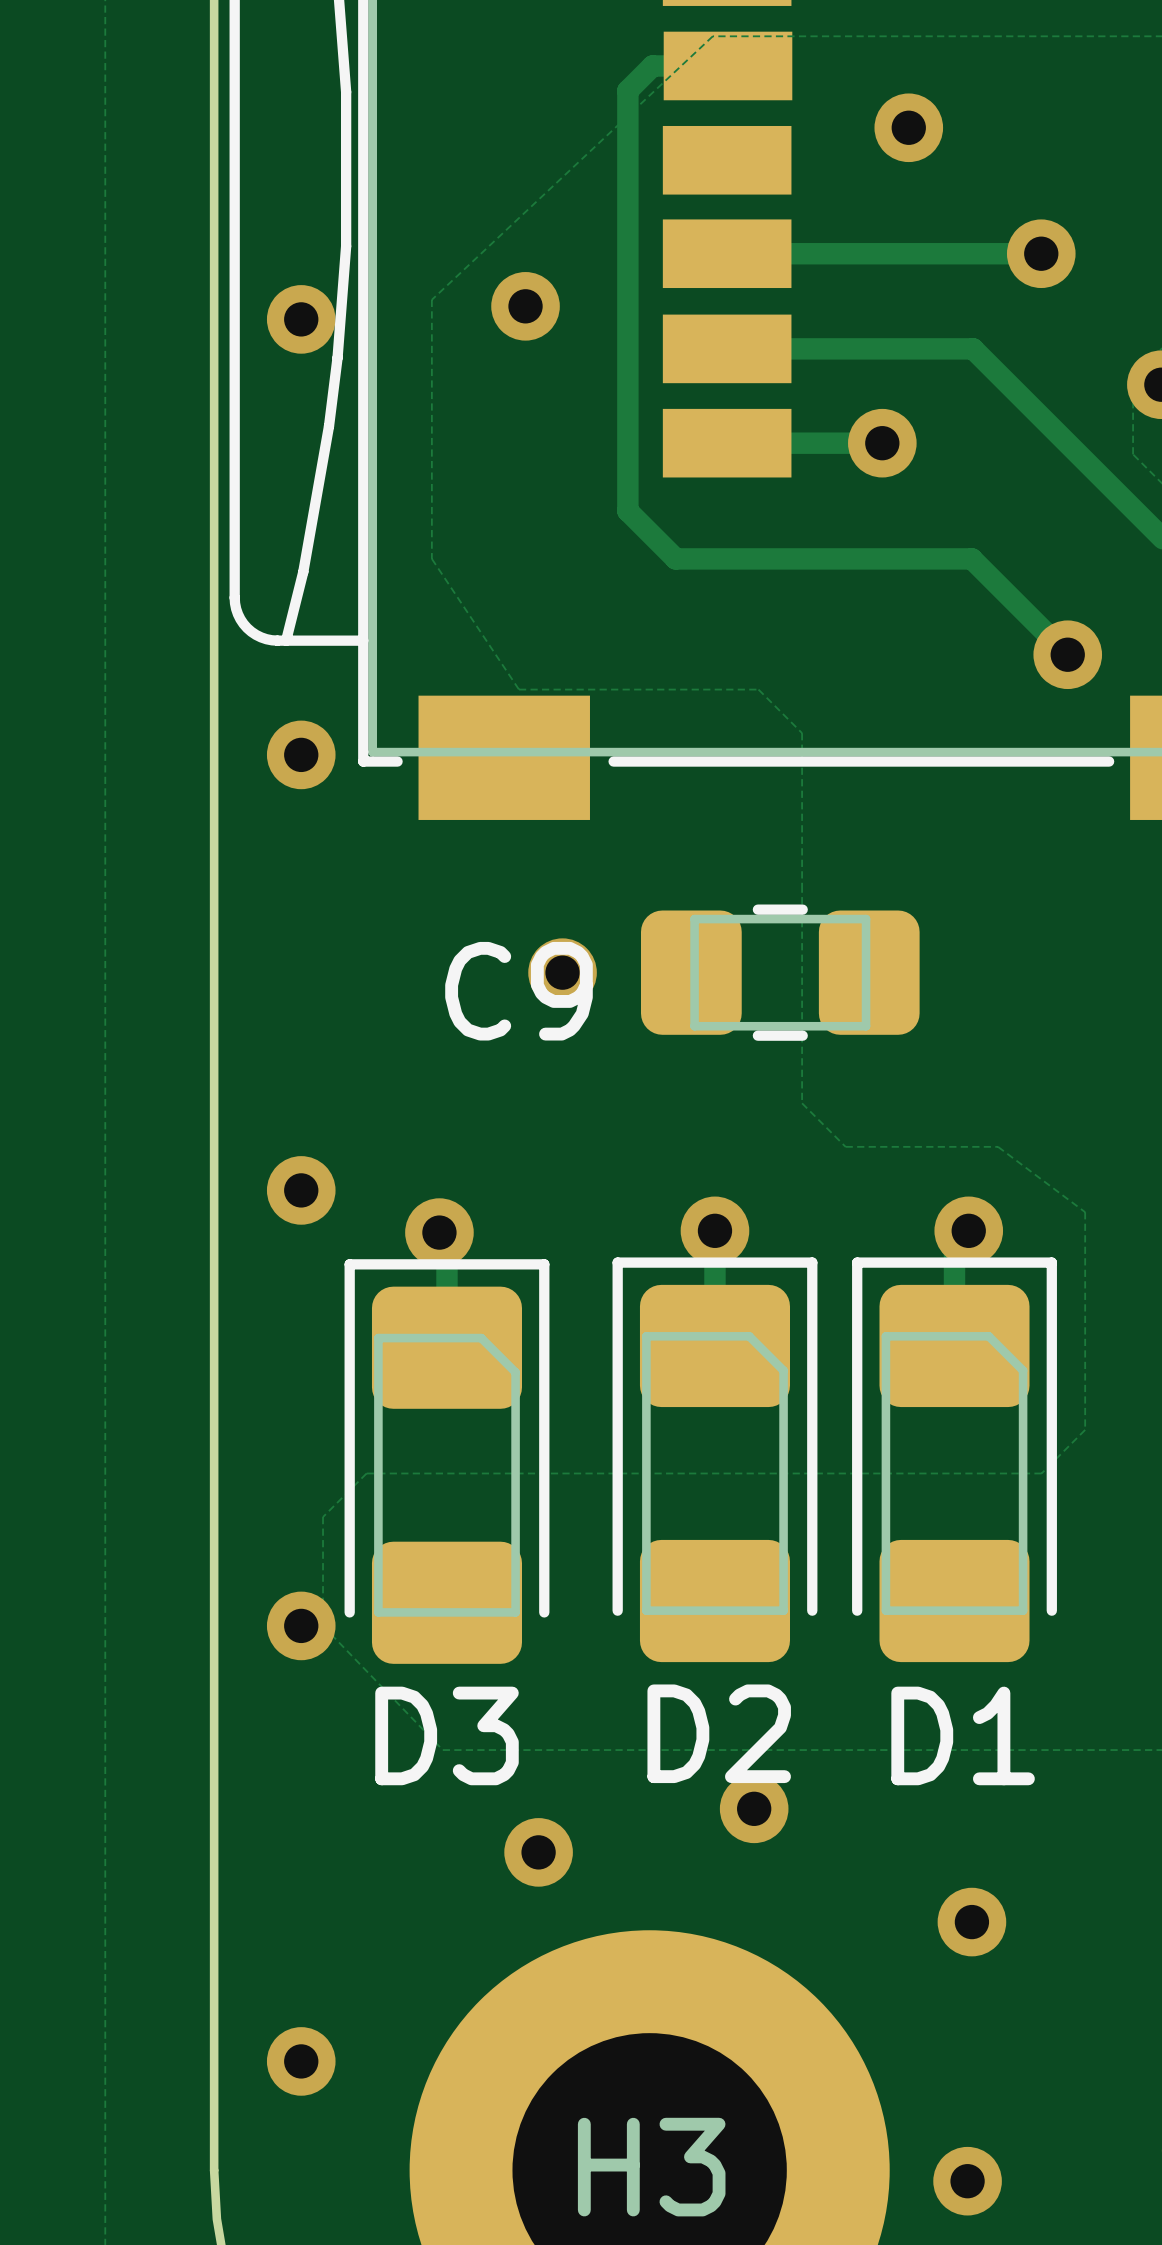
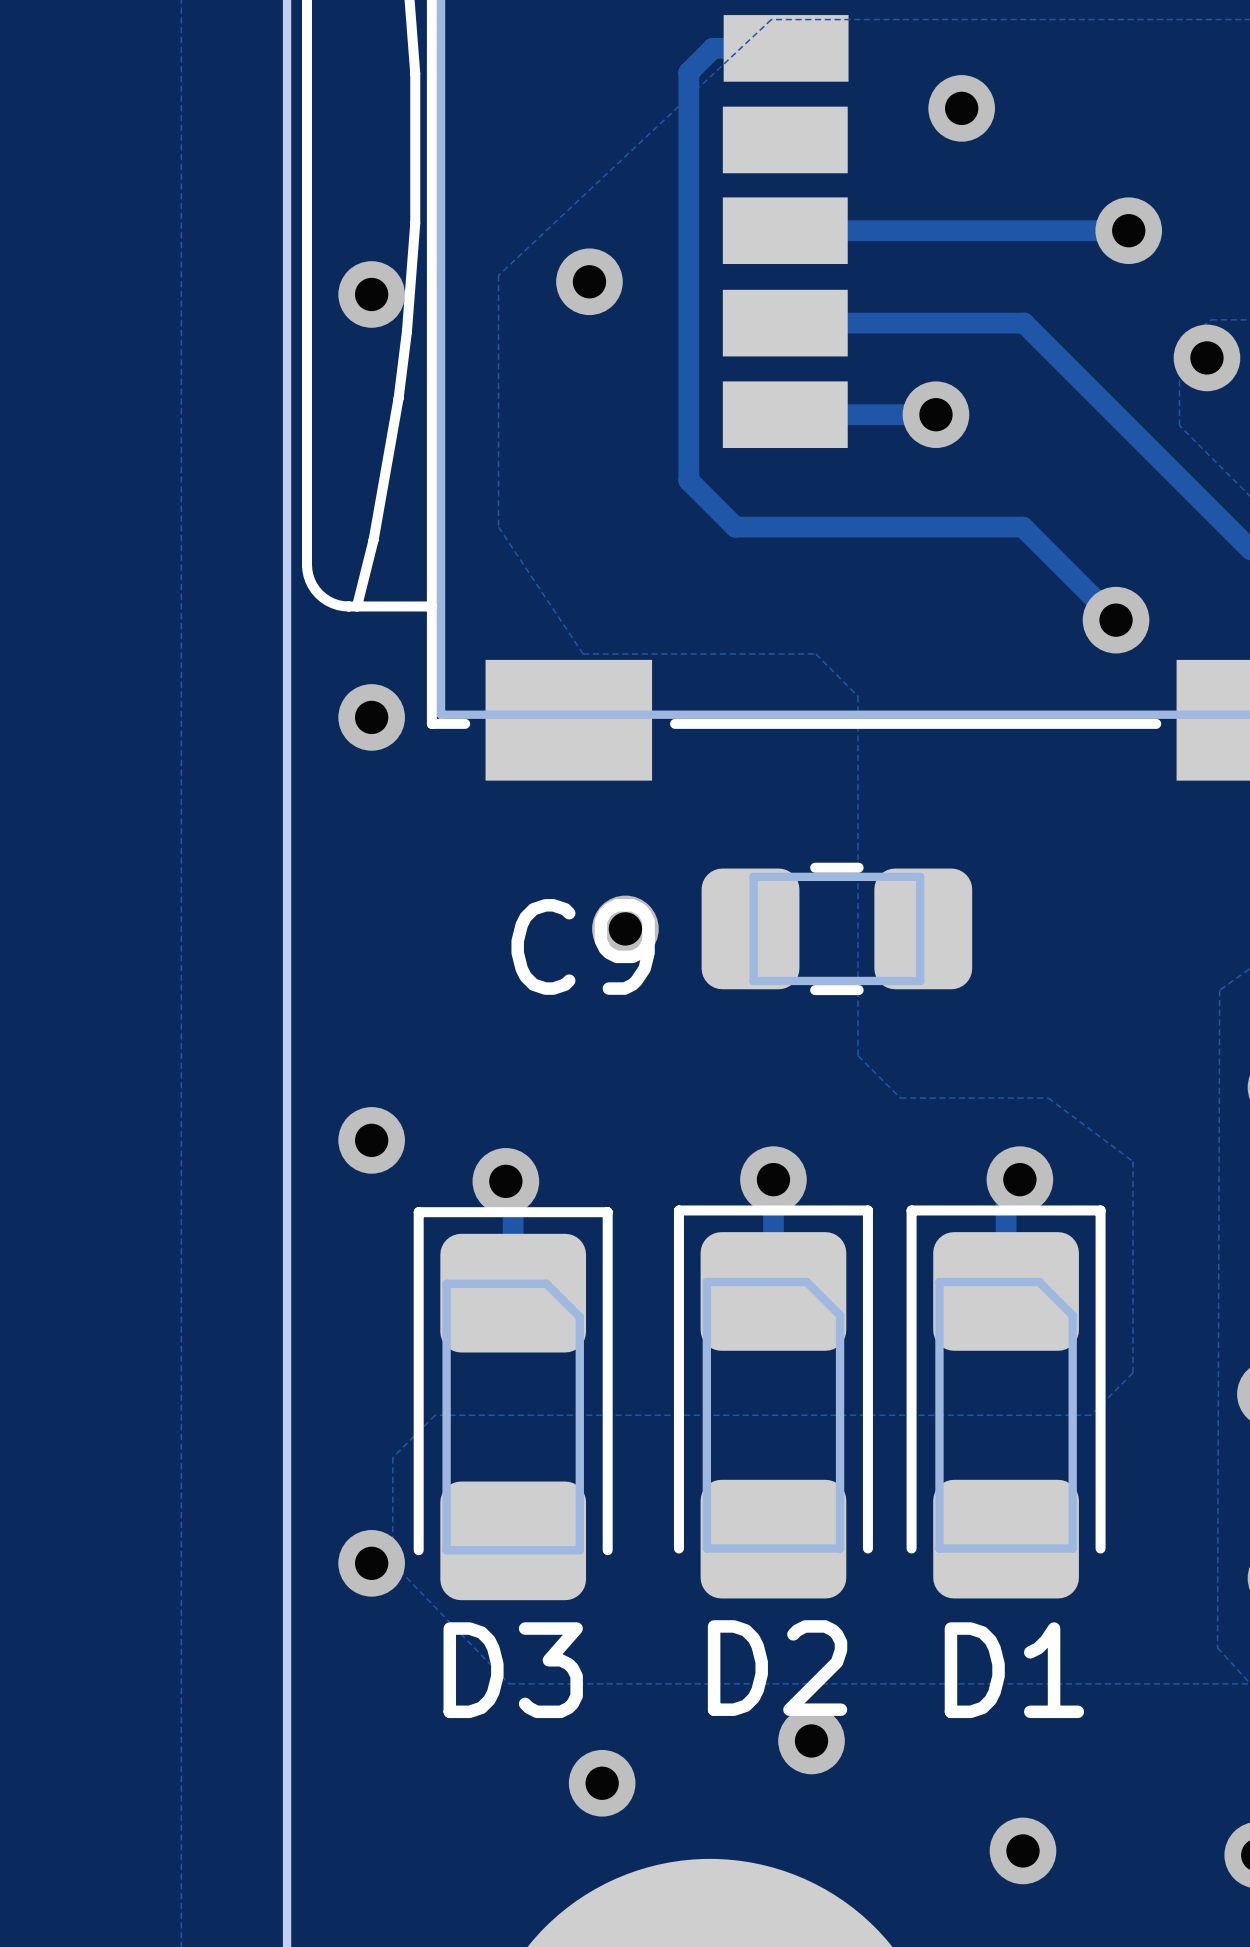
via position: (1041, 253) -> (1128, 230)

